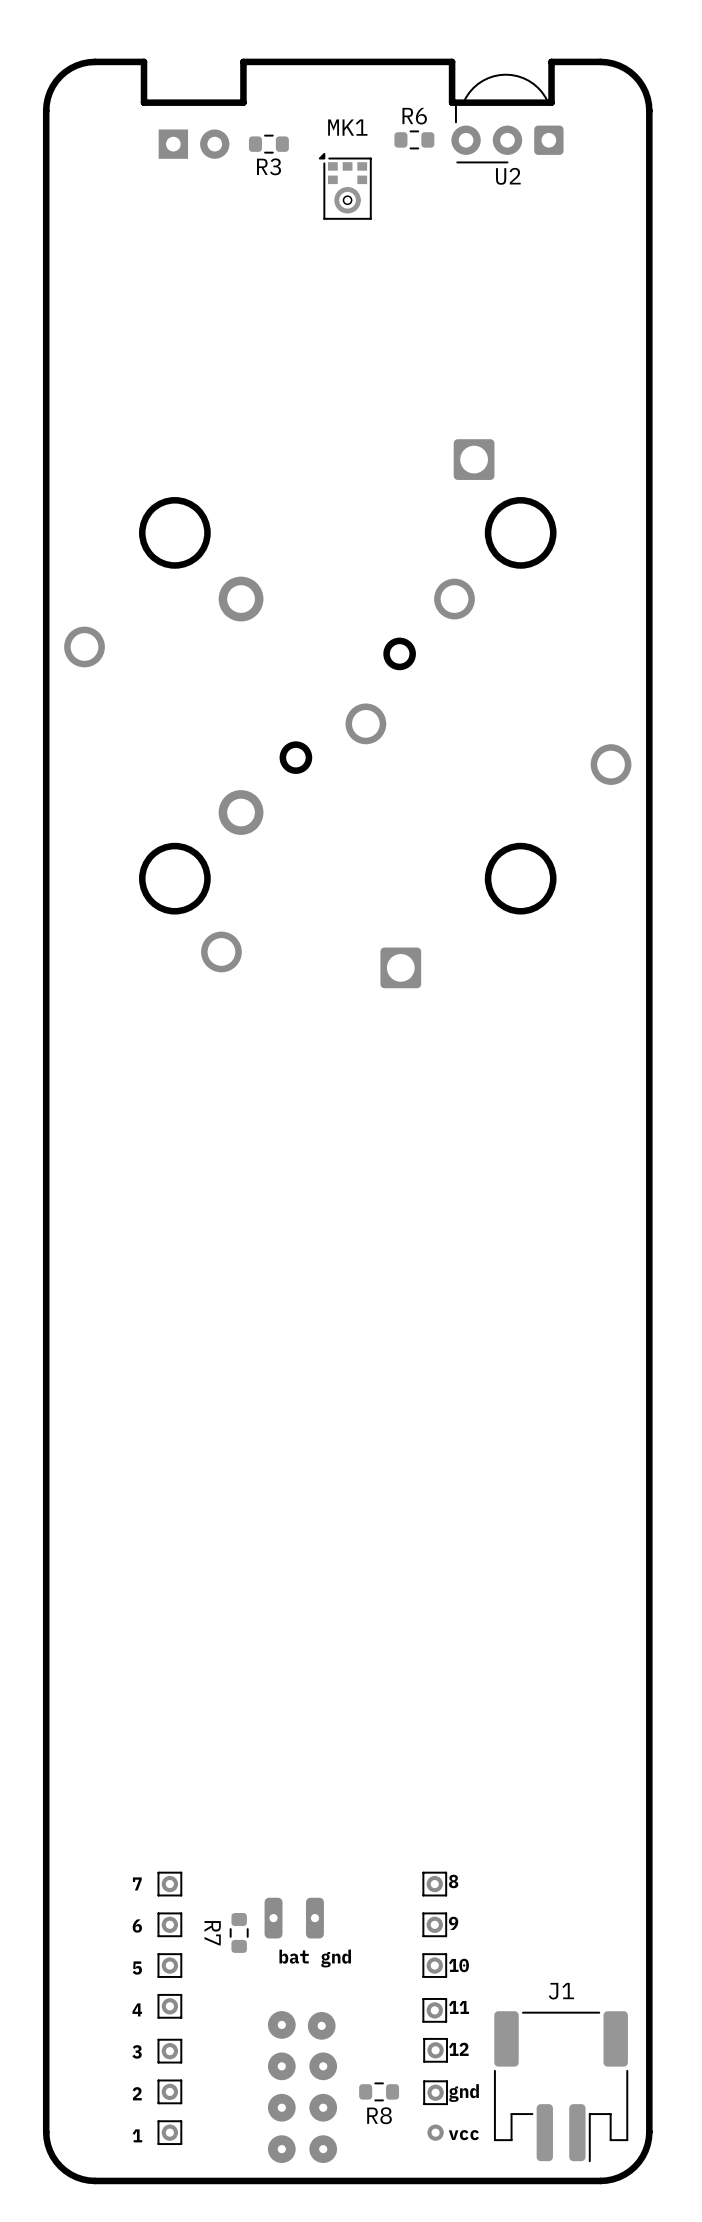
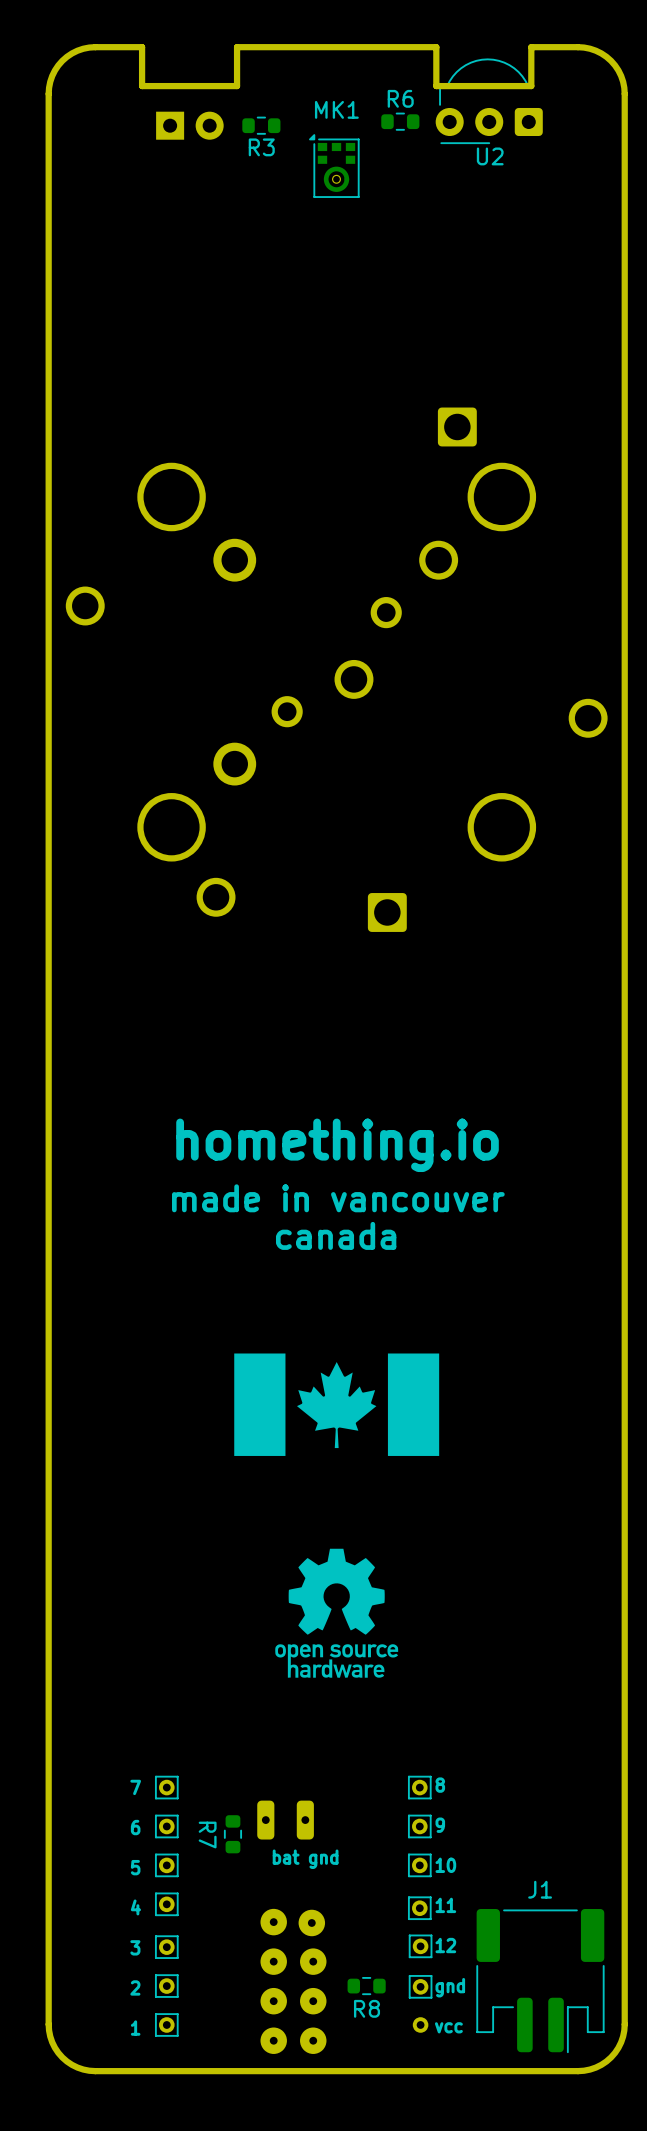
text: none -> homething.io (337, 1145)
text: none -> made in vancouver (338, 1198)
text: none -> canada (336, 1235)
drawing: none -> [234, 1353, 440, 1456]
drawing: none -> [275, 1548, 399, 1678]

